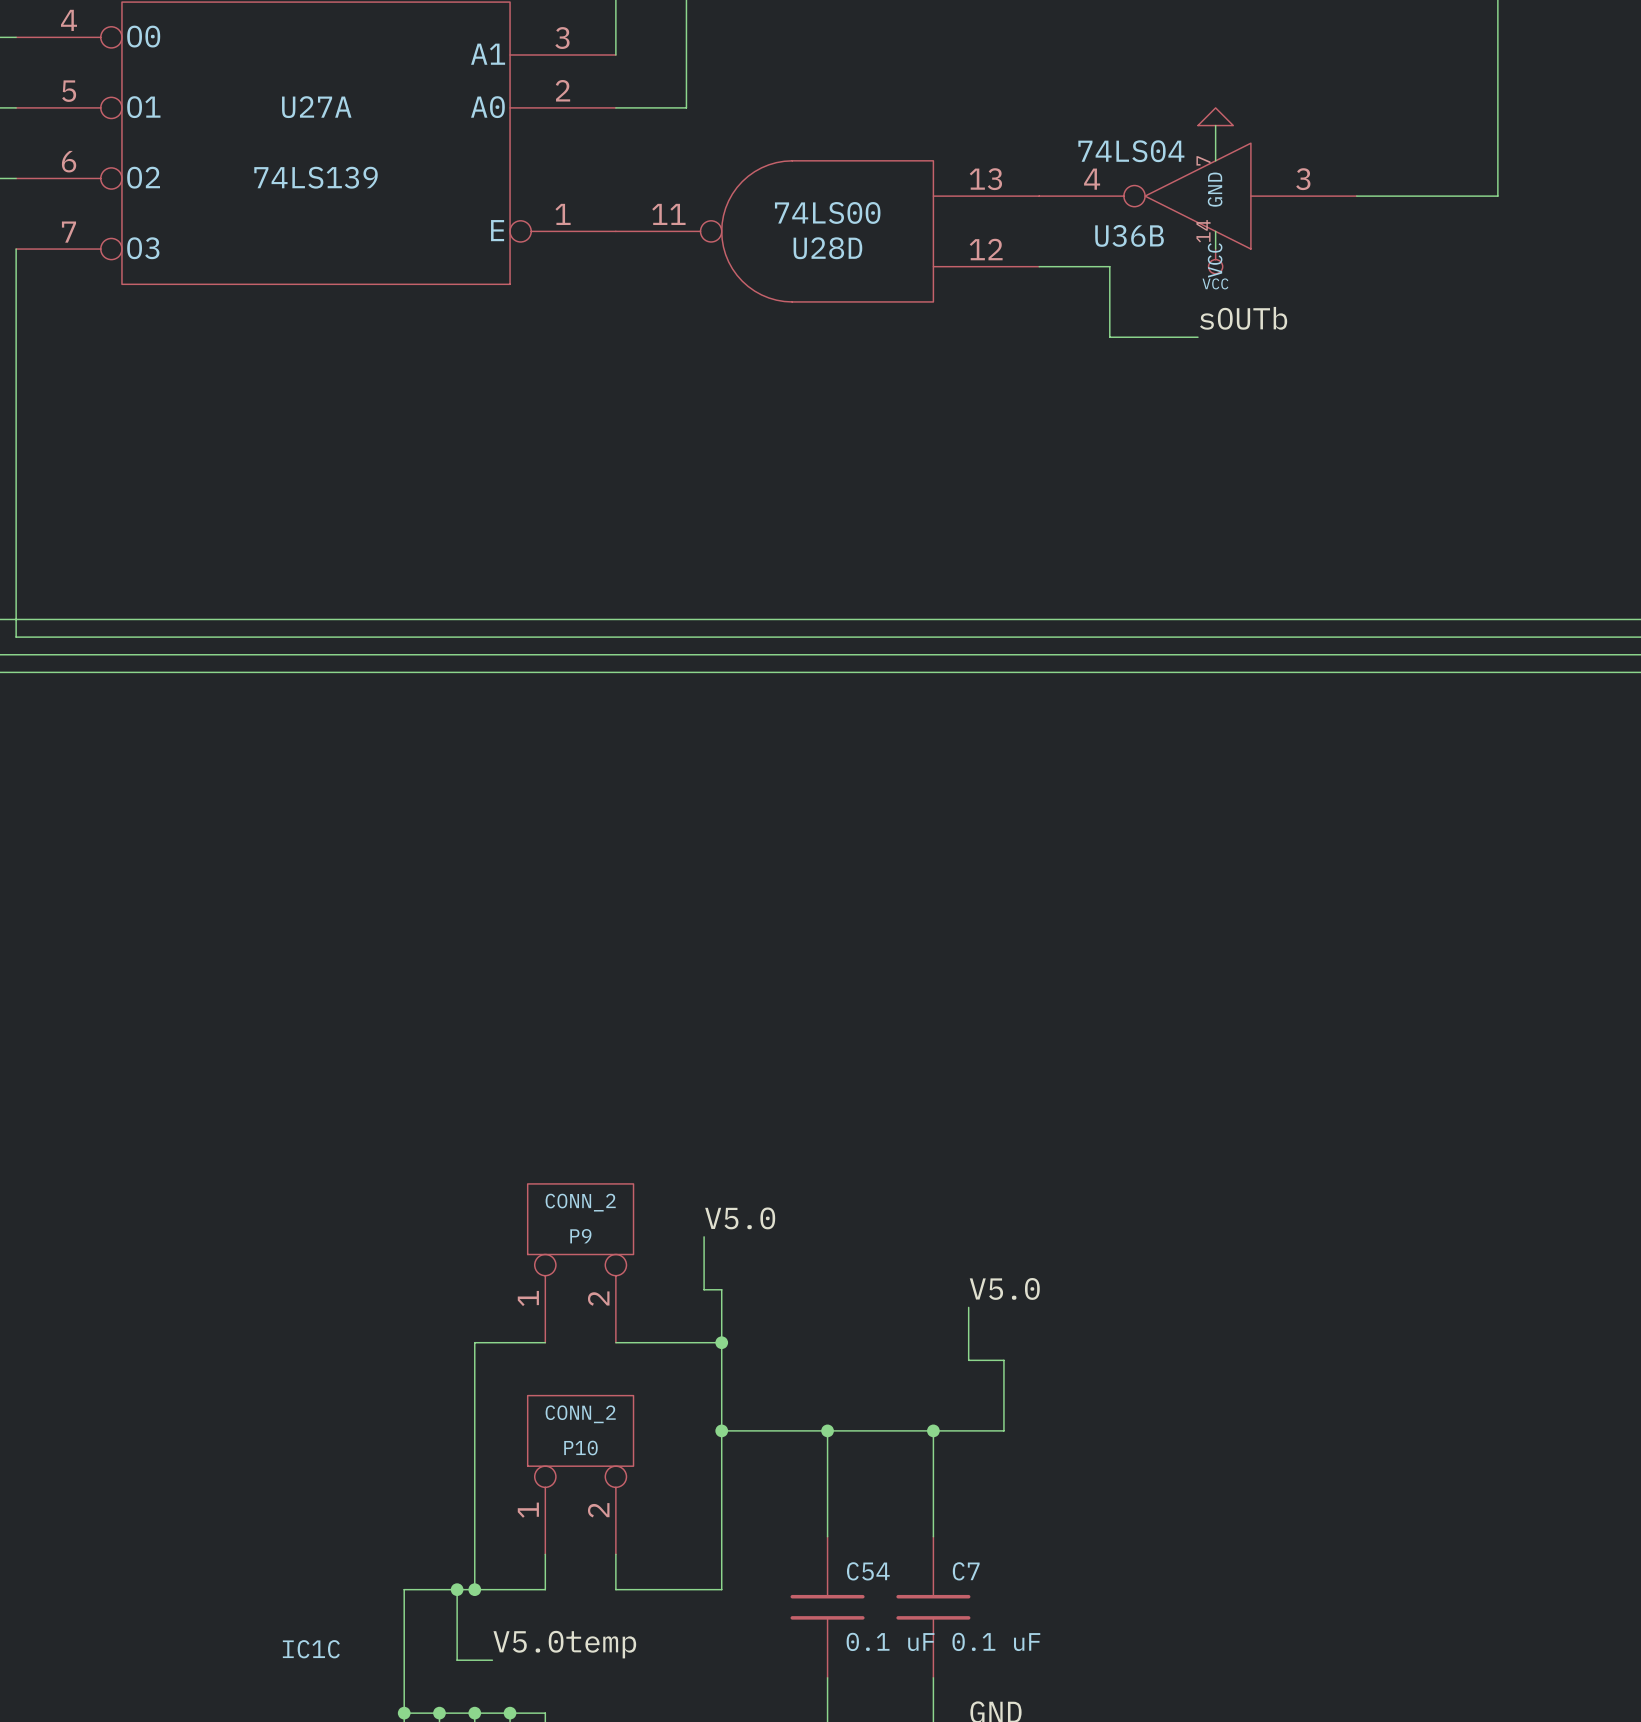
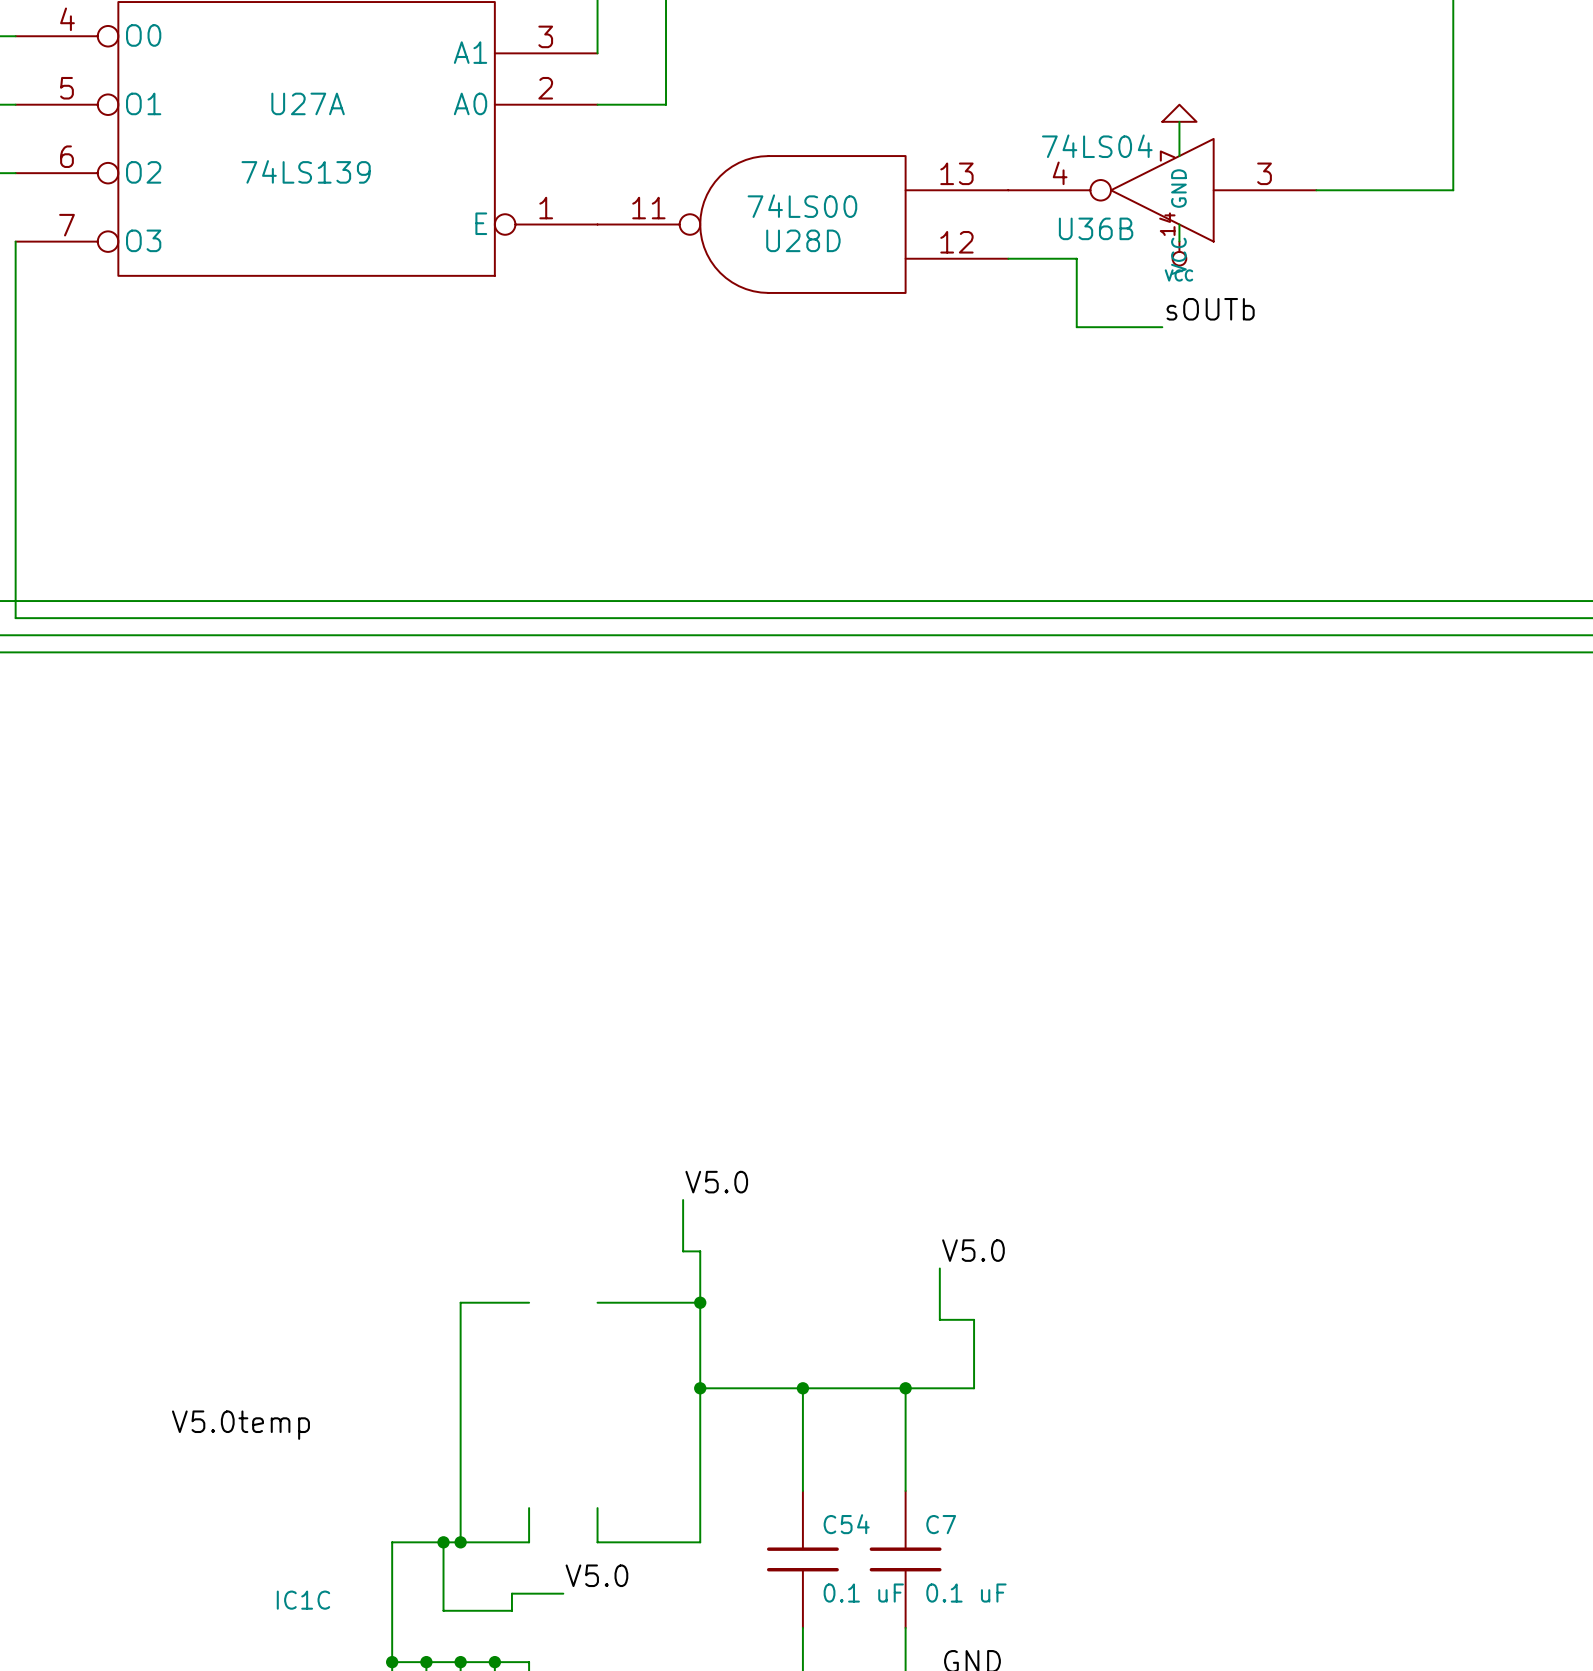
P9: CONN_2 (580, 1263) -> none
label: none -> V5.0temp (240, 1425)
P10: CONN_2 (580, 1475) -> none
wire: none -> (563, 1593) (511, 1593) (511, 1610) (477, 1610)
label: V5.0temp (564, 1644) -> V5.0 (596, 1575)

